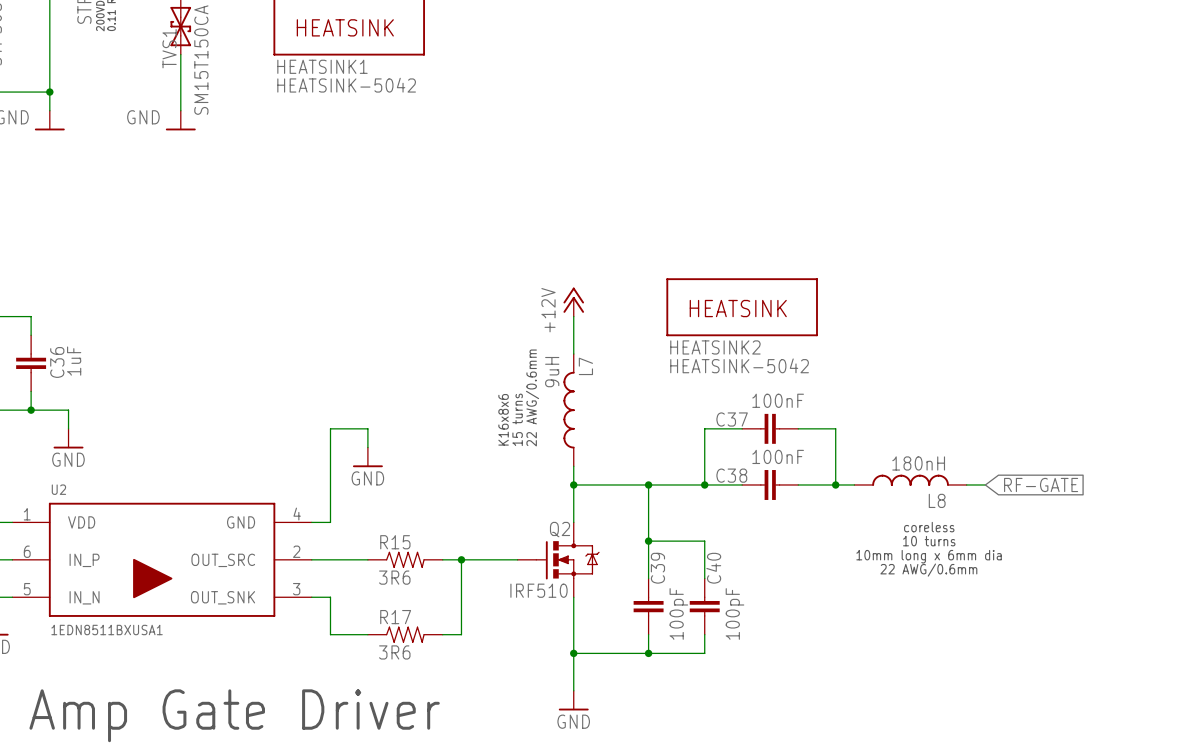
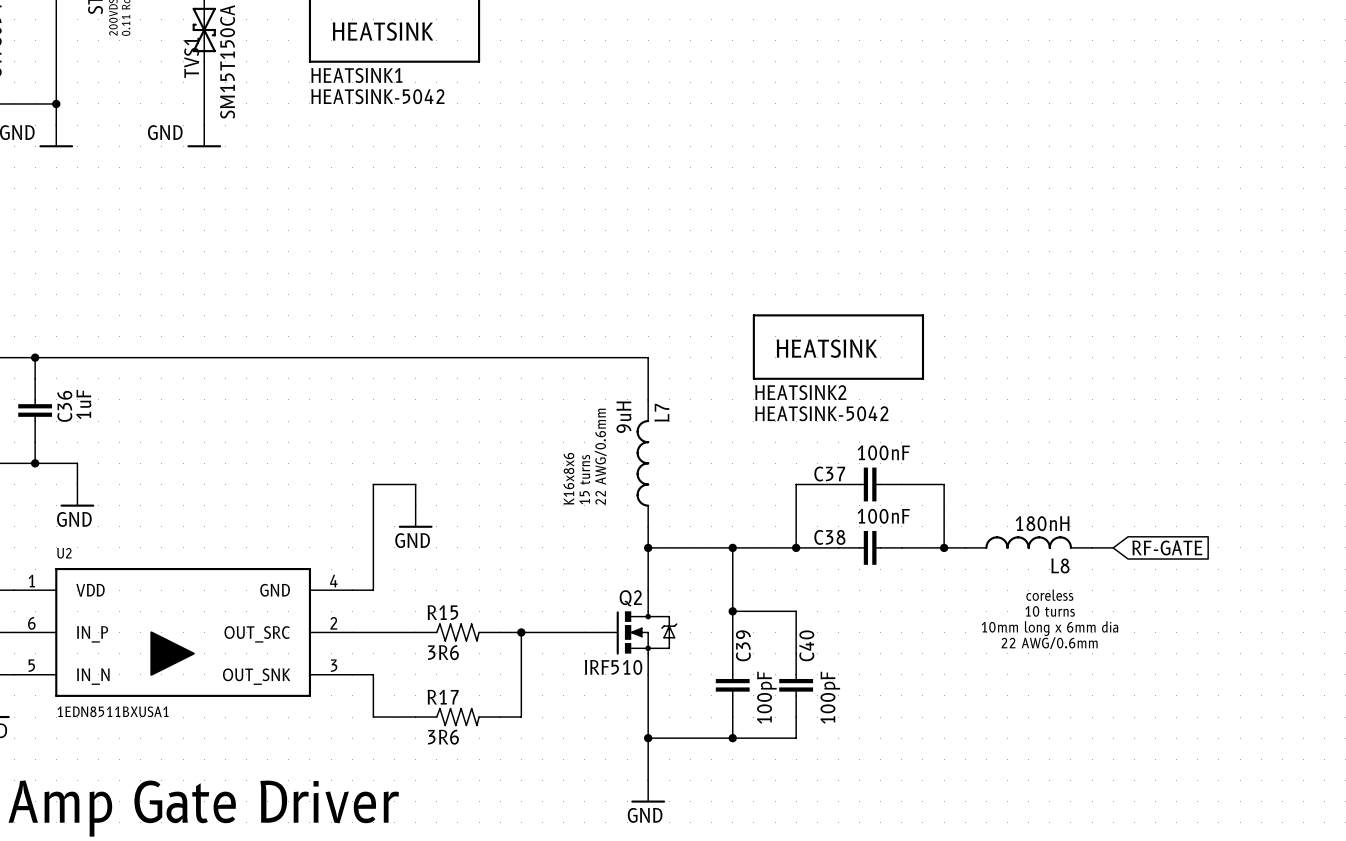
power symbol: +12V (573, 302) -> none
wire: none -> (35, 357) (648, 357)
junction: none -> (35, 357)

